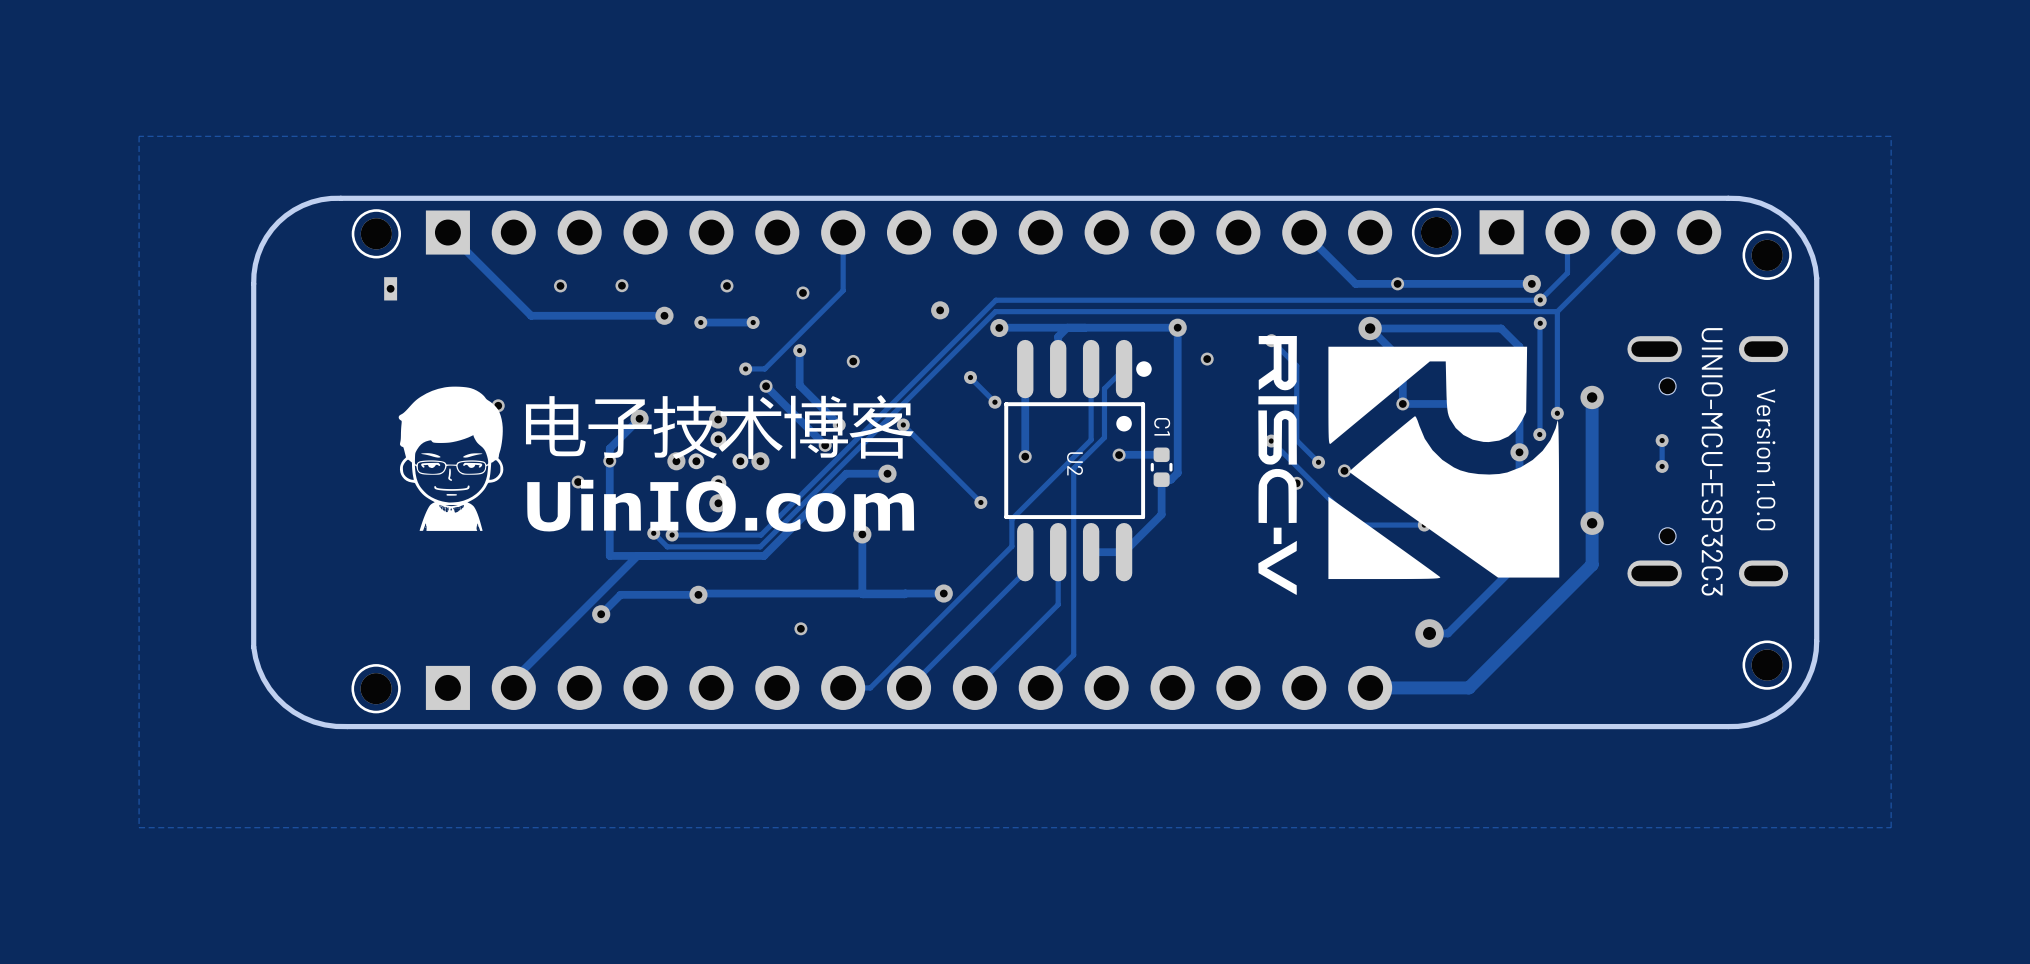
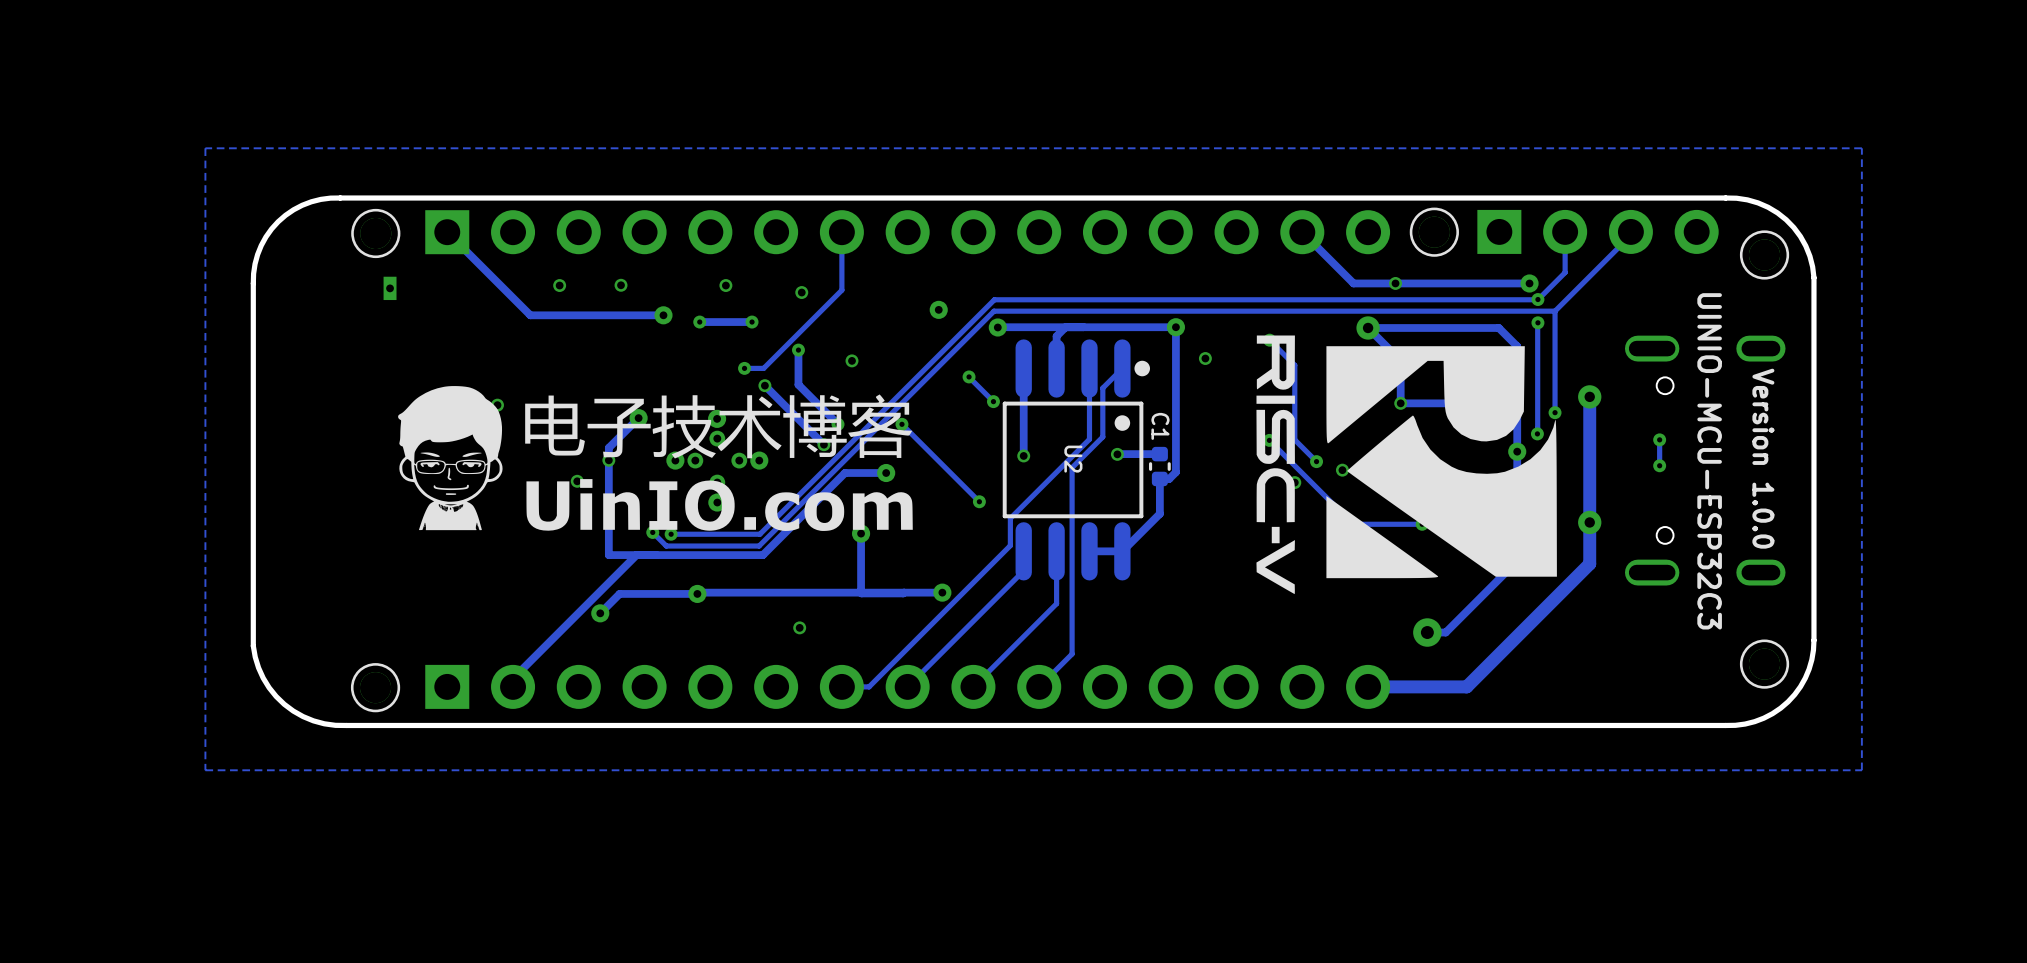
zone outline: (1891, 136) (1891, 827) (139, 827) (139, 136) (1891, 136) -> (1861, 148) (1861, 770) (205, 770) (205, 148) (1861, 148)

